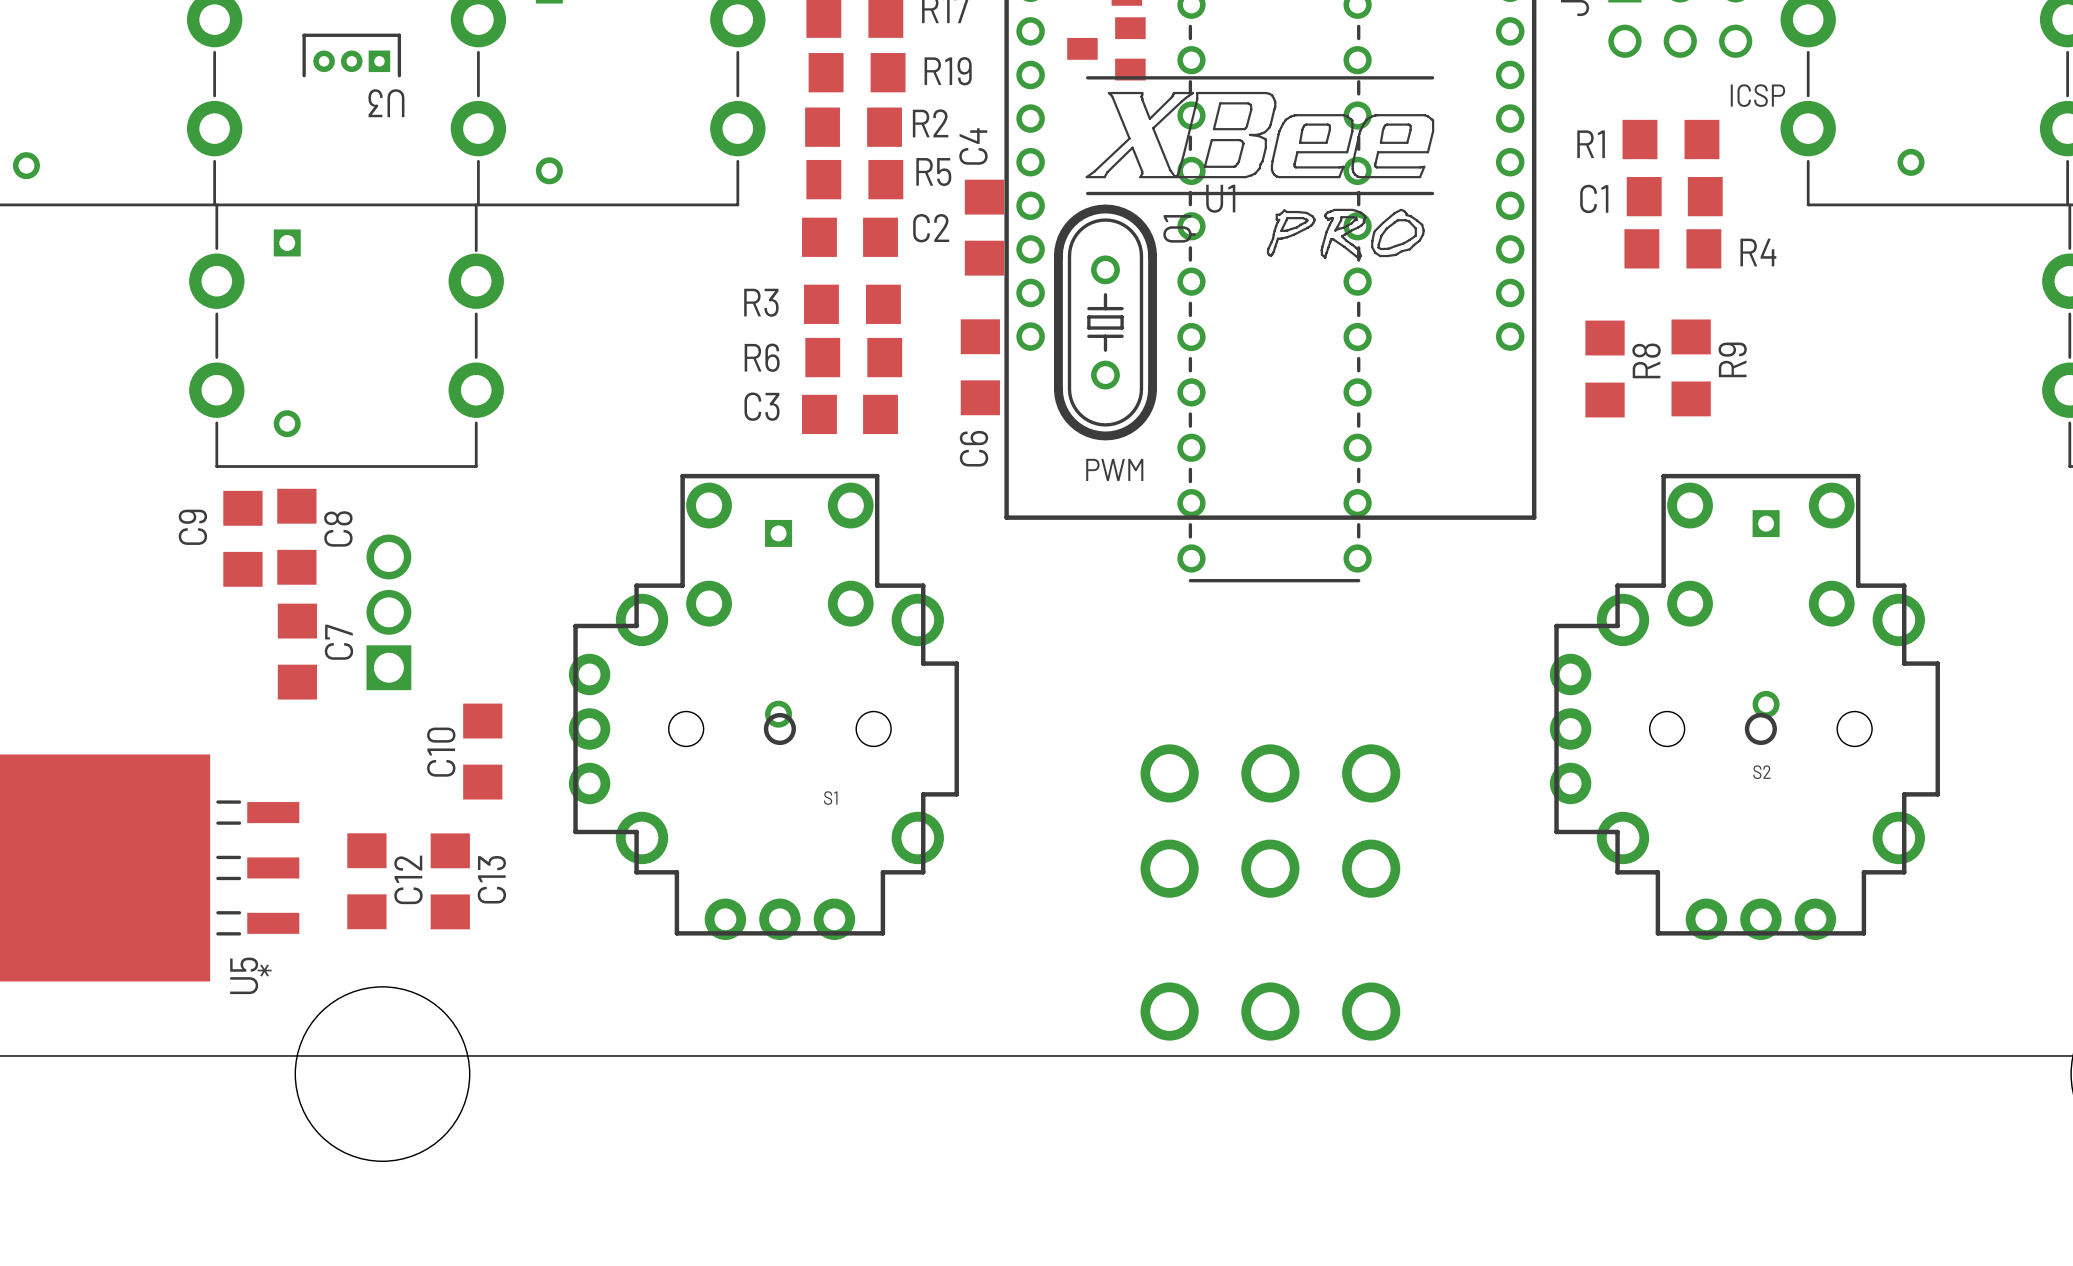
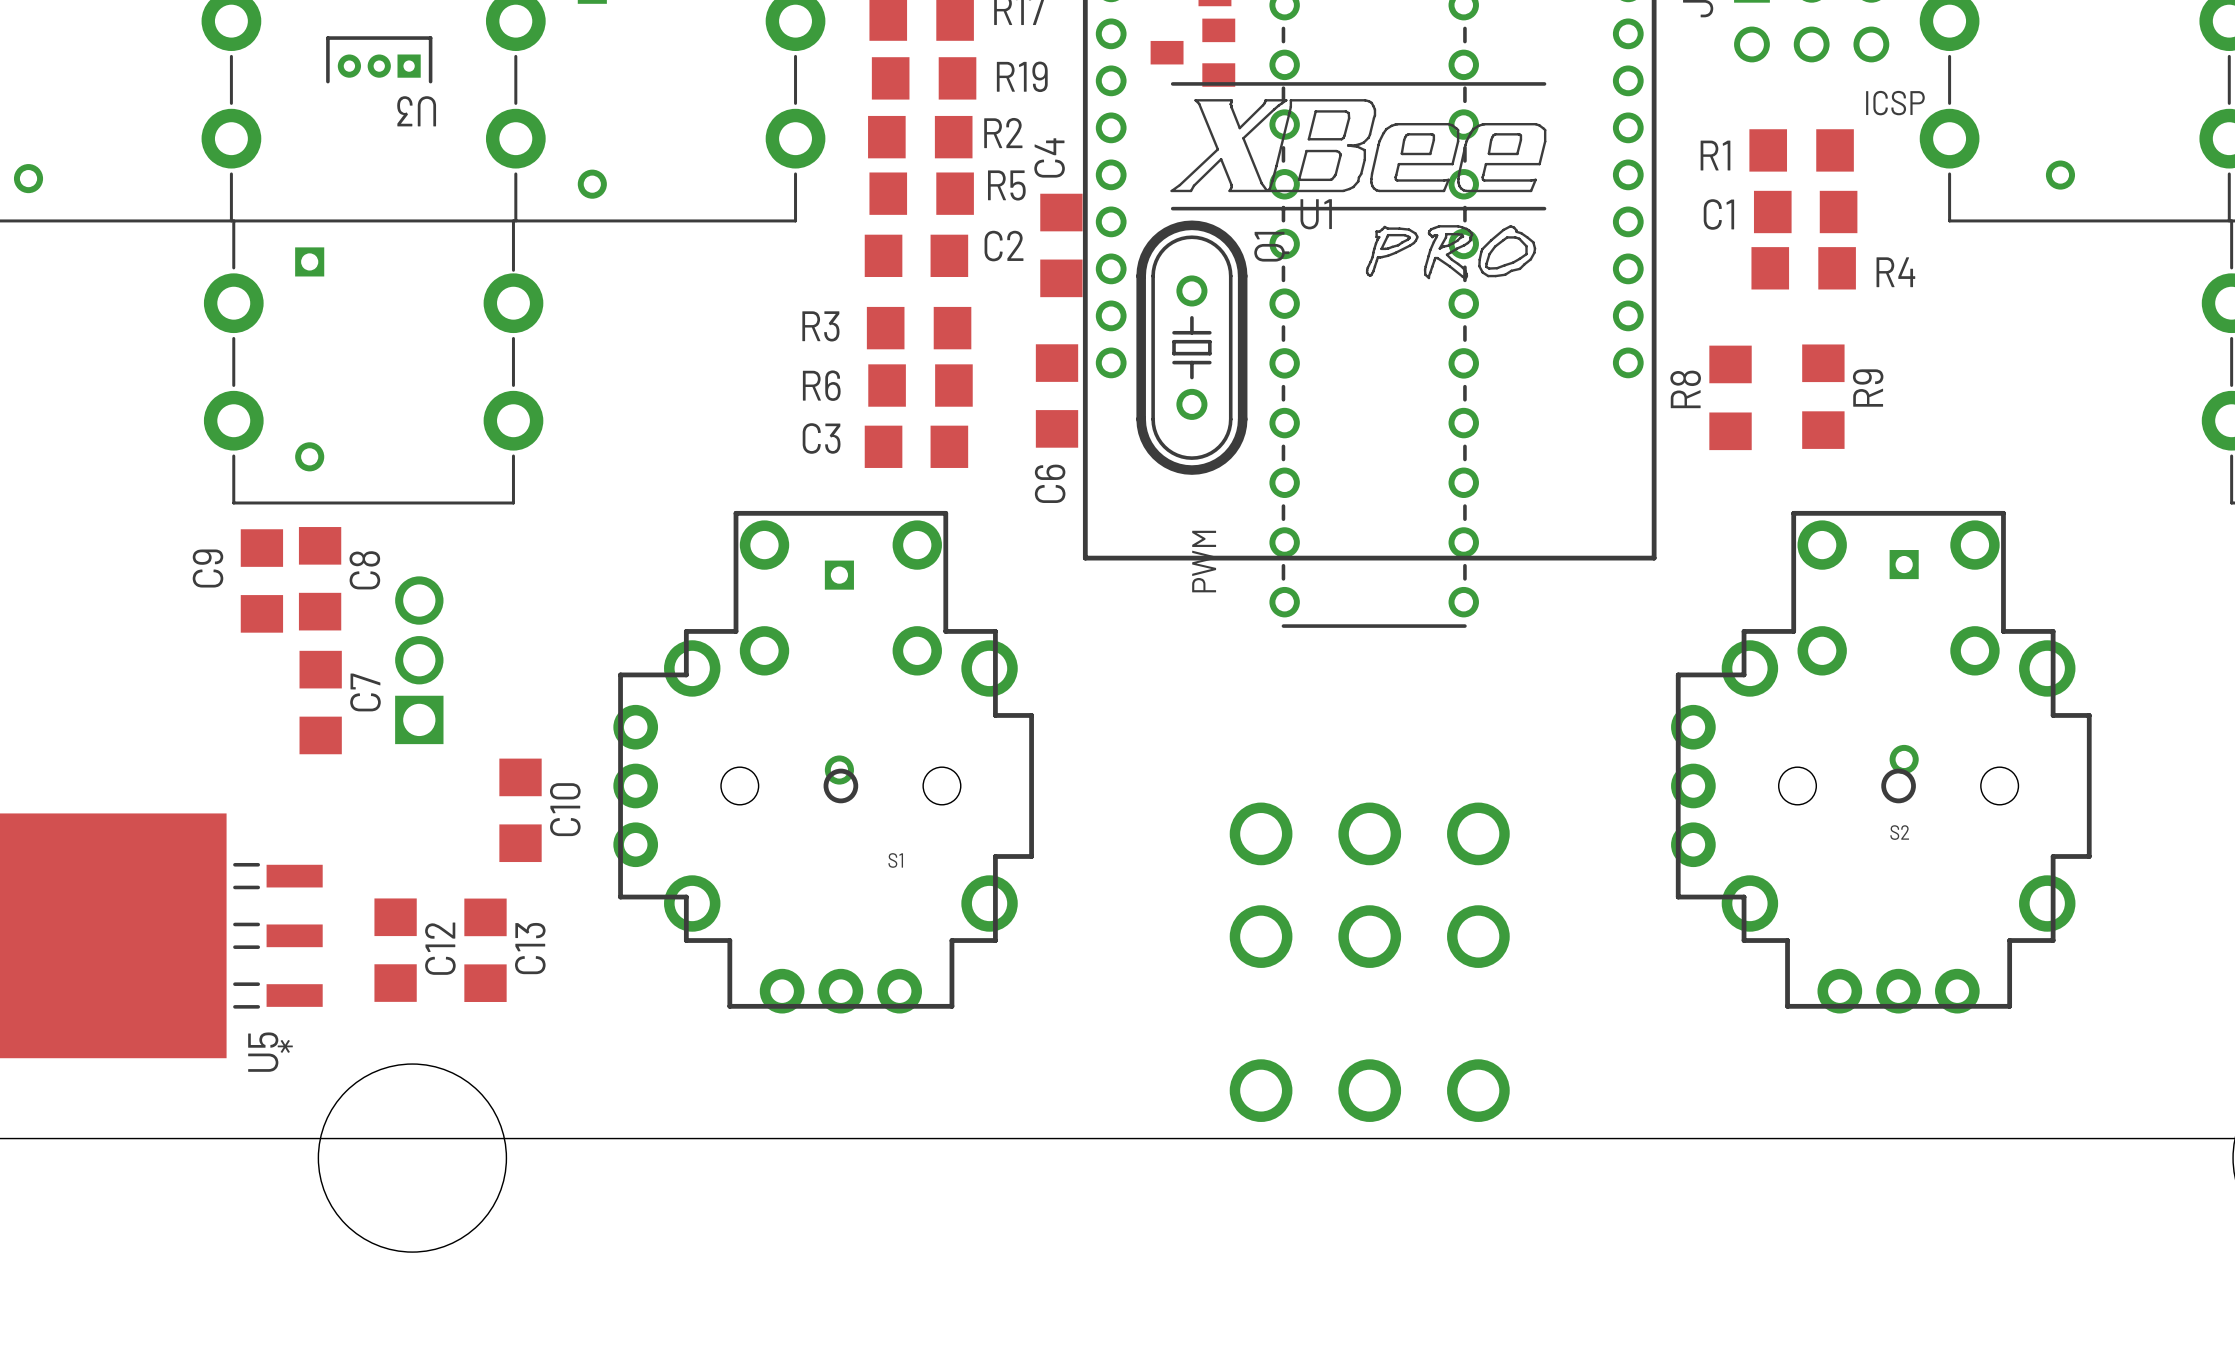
R8 name position: R8 (1646, 360) -> R8 (1685, 389)
text rotation: 0° (1114, 469) -> 90° counterclockwise (1204, 561)
C10 name position: C10 (441, 752) -> C10 (565, 809)

